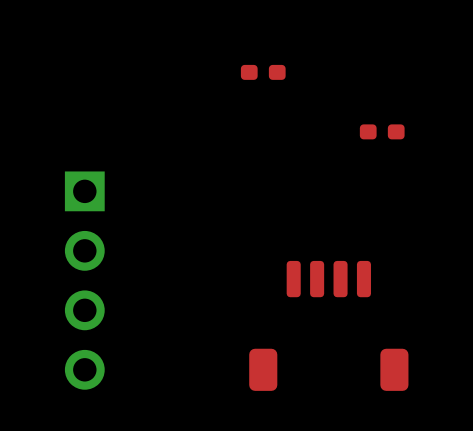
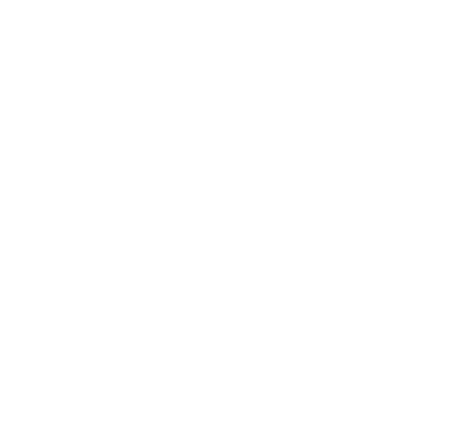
part: (263, 72) -> none
part: (382, 131) -> none
part: (84, 280) -> none
part: (328, 325) -> none

